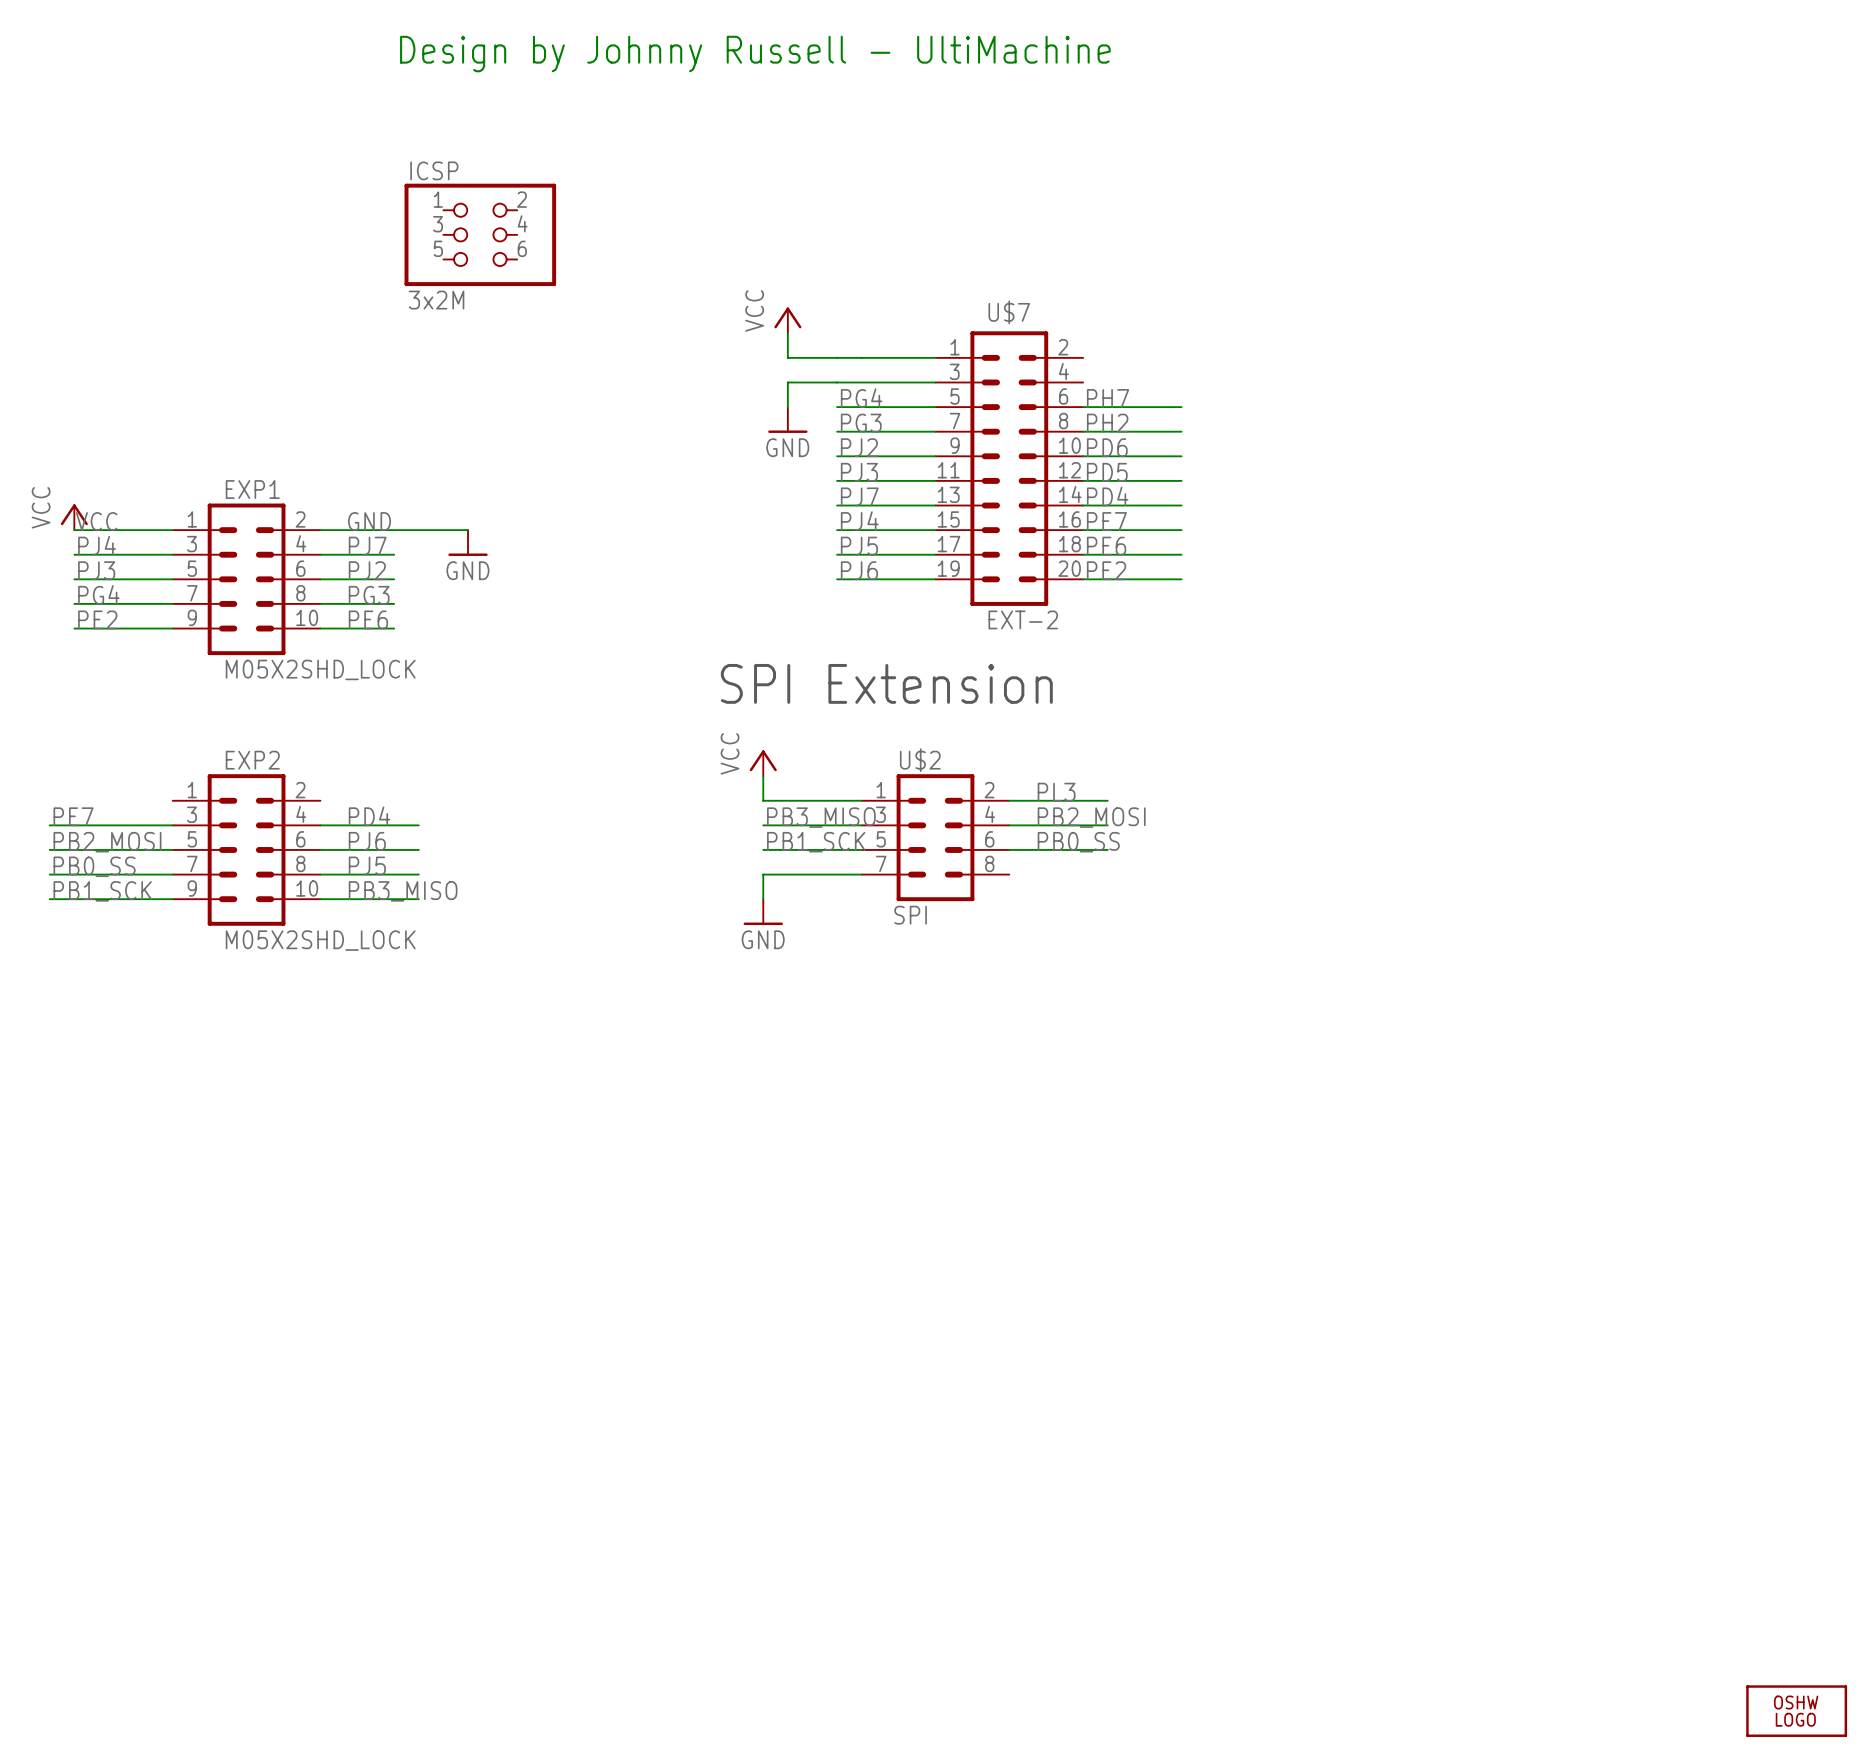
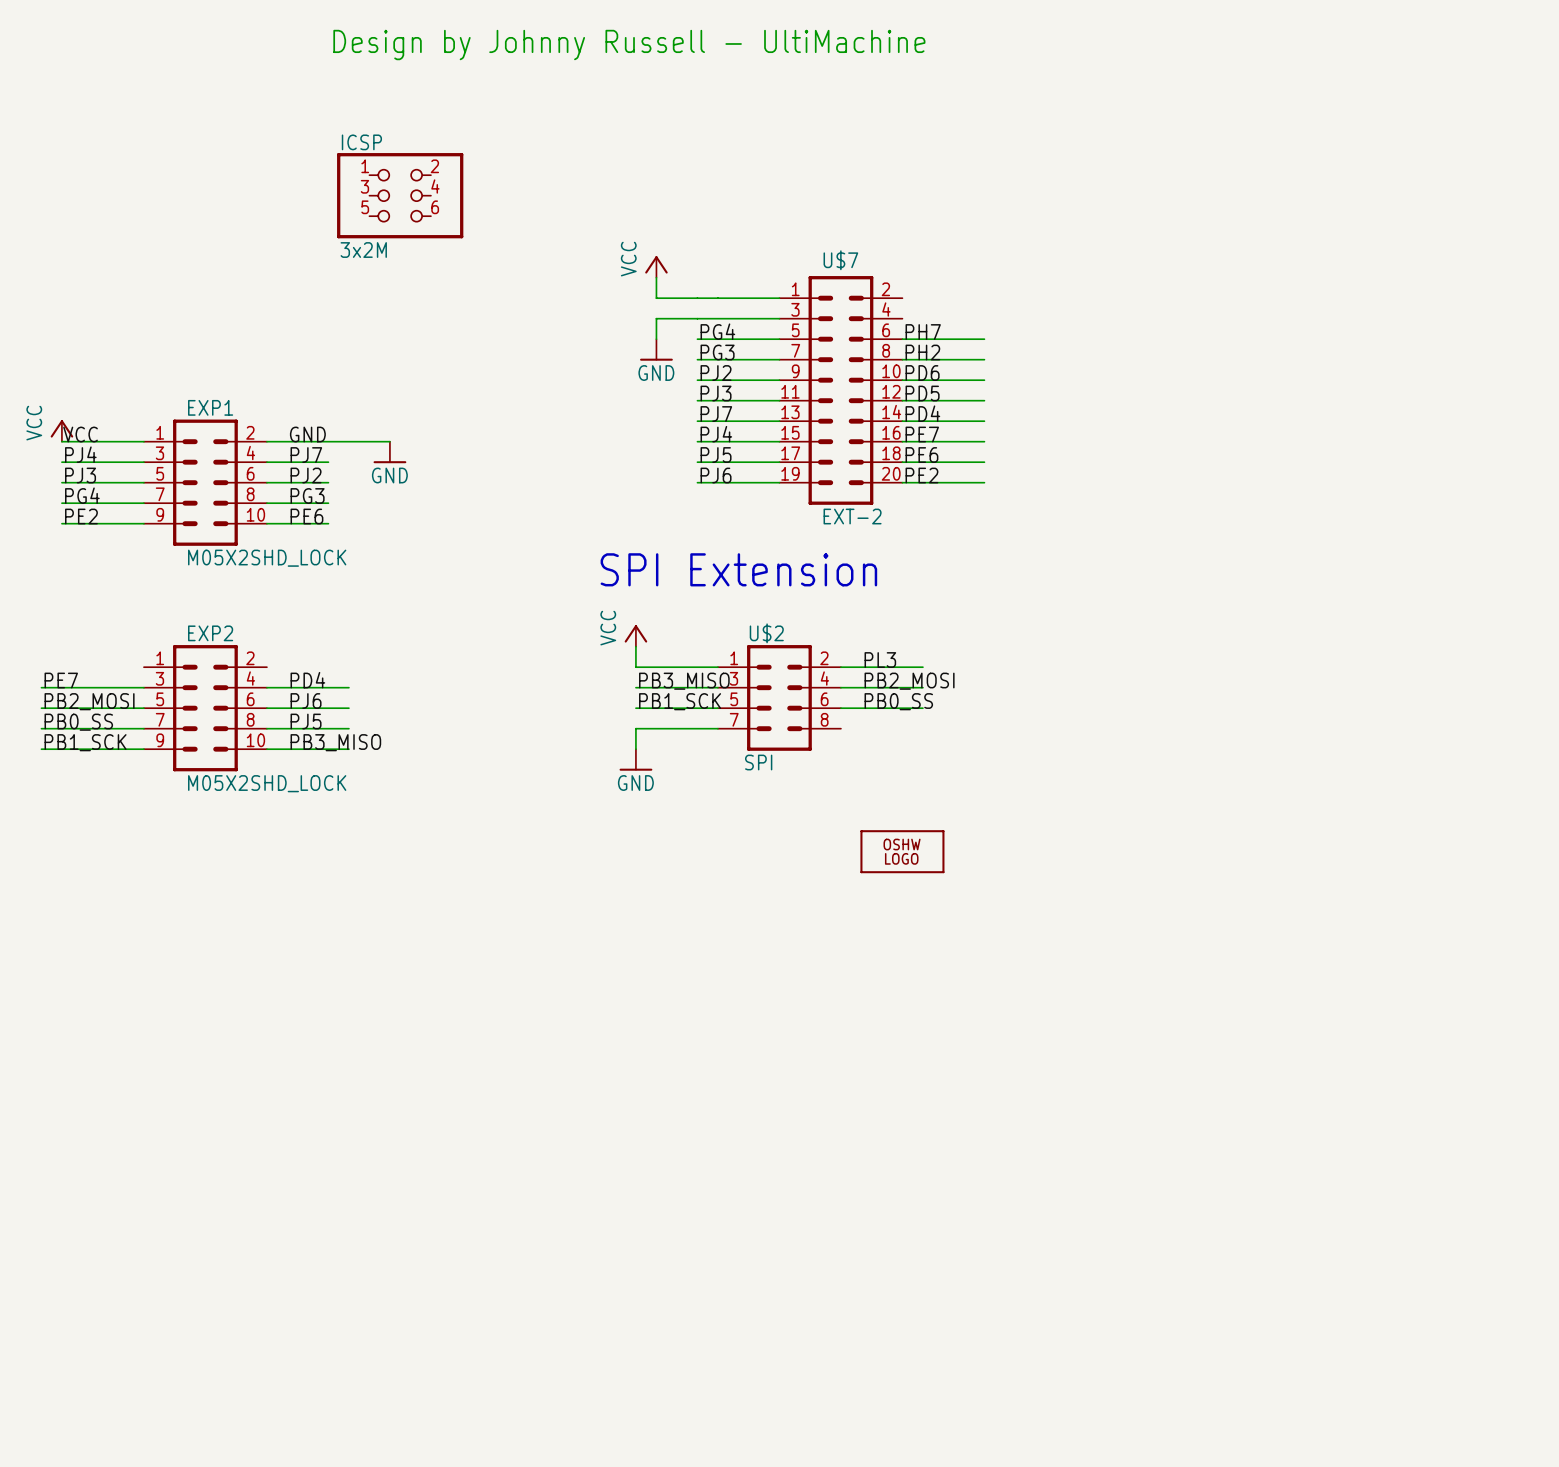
part: none -> (902, 851)
part: (1796, 1711) -> none

